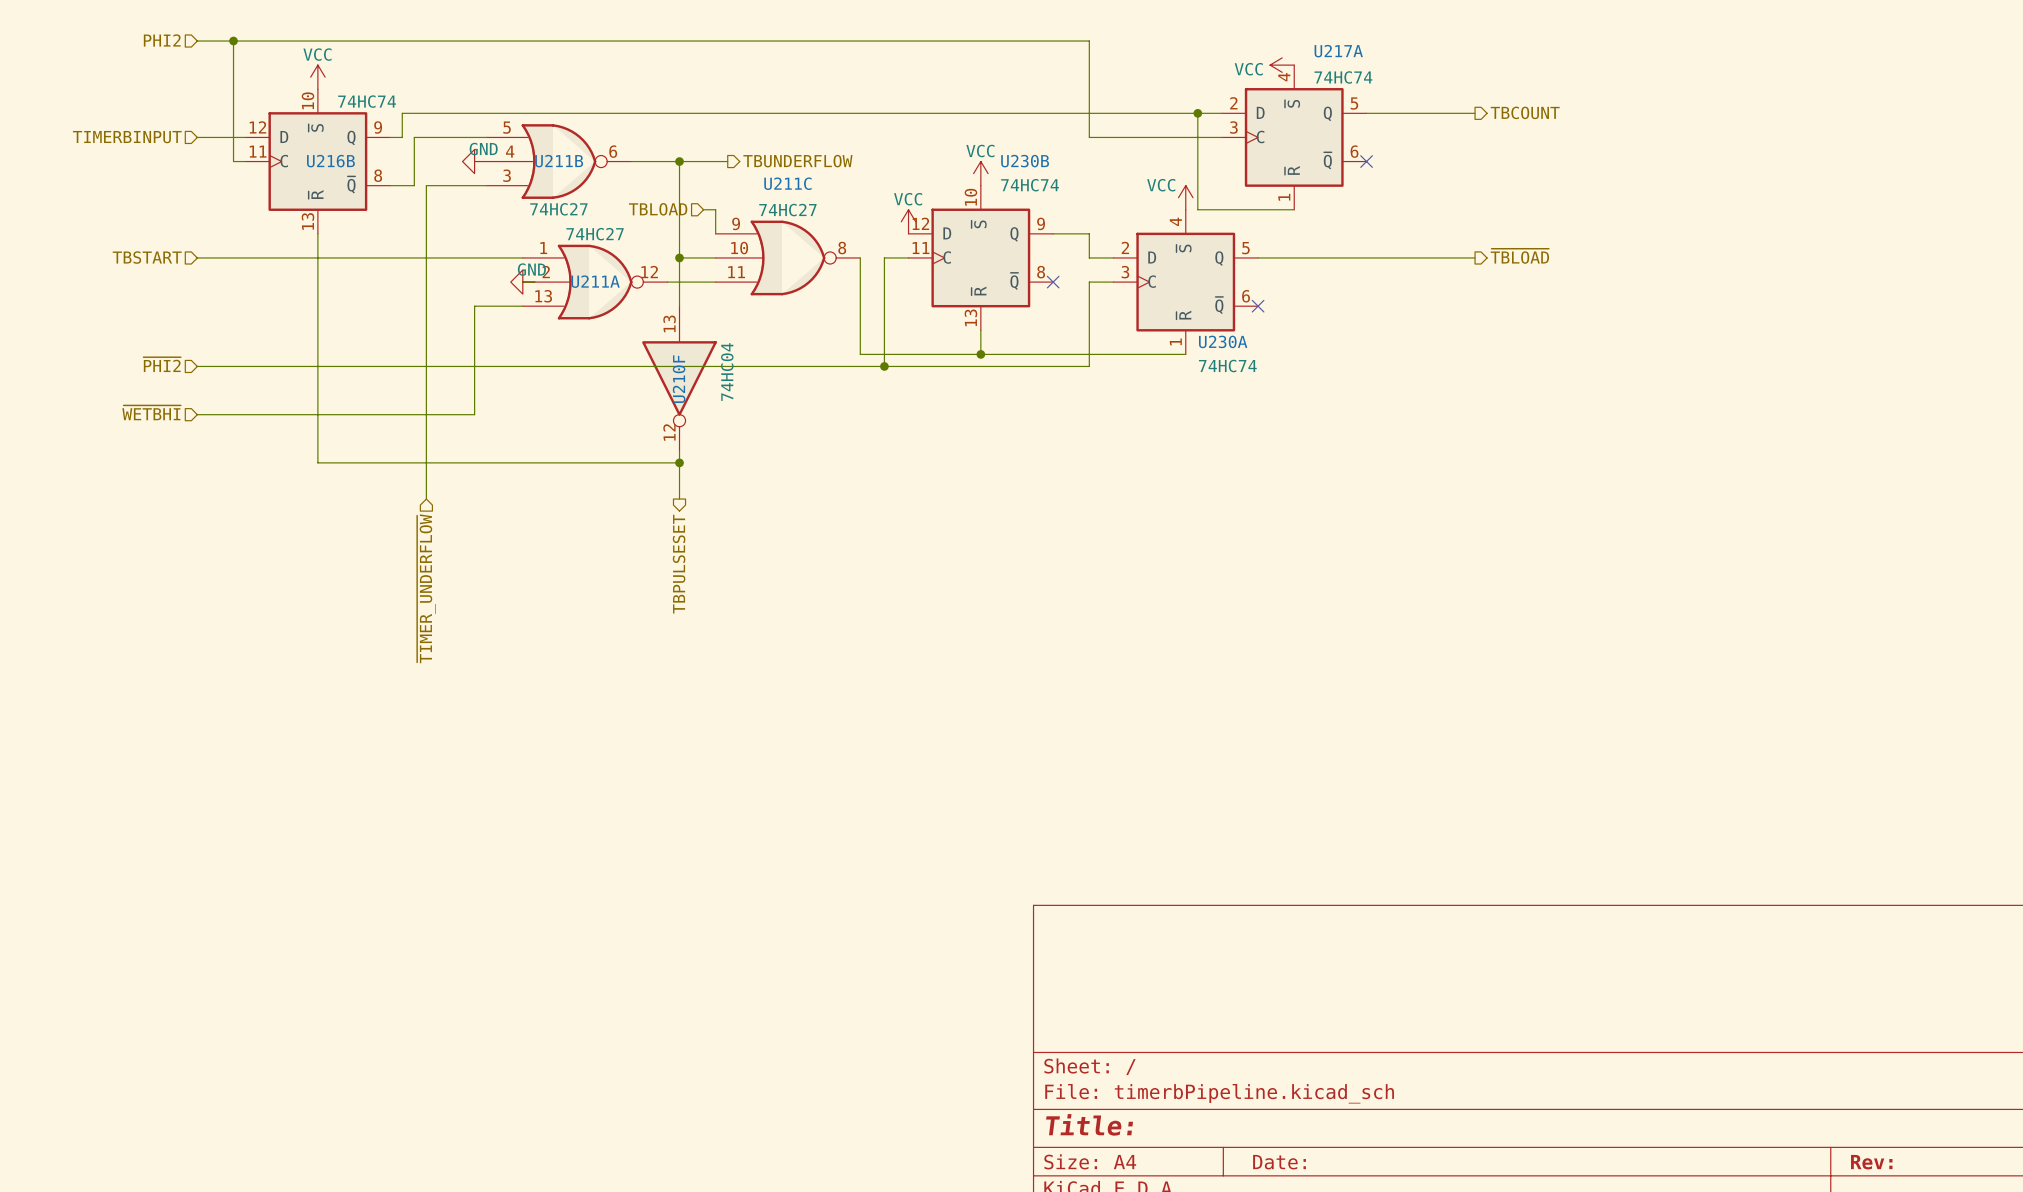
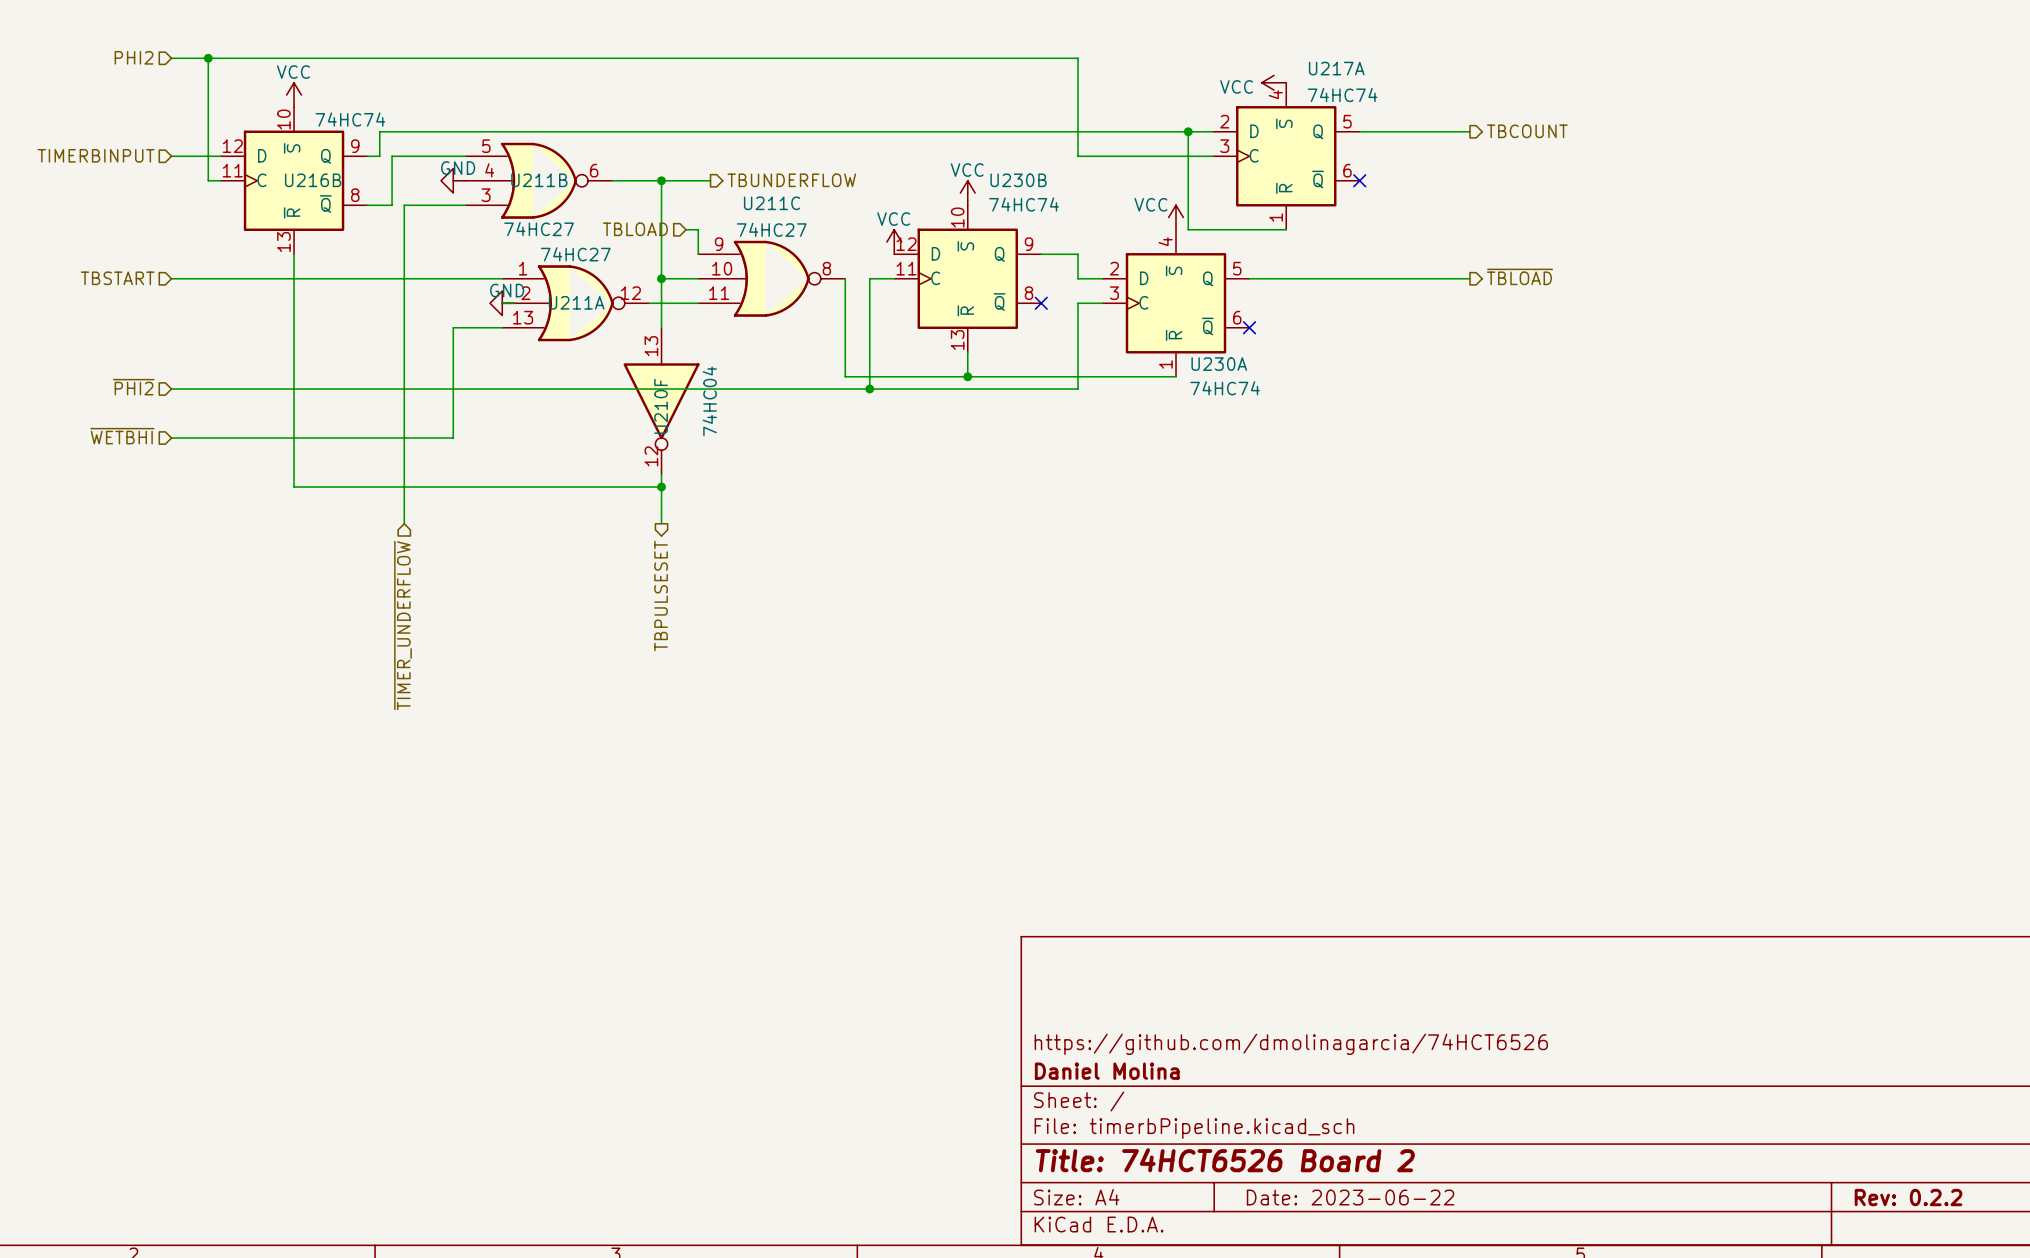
title block: none -> https://github.com/dmolinagarcia/74HCT6526 (1291, 1044)
title block: none -> Daniel Molina (1107, 1071)
title block: Title: (1089, 1124) -> Title: 74HCT6526 Board 2 (1225, 1160)
title block: Date: (1279, 1162) -> Date: 2023-06-22 (1350, 1197)
title block: Rev: (1871, 1162) -> Rev: 0.2.2 (1908, 1197)

